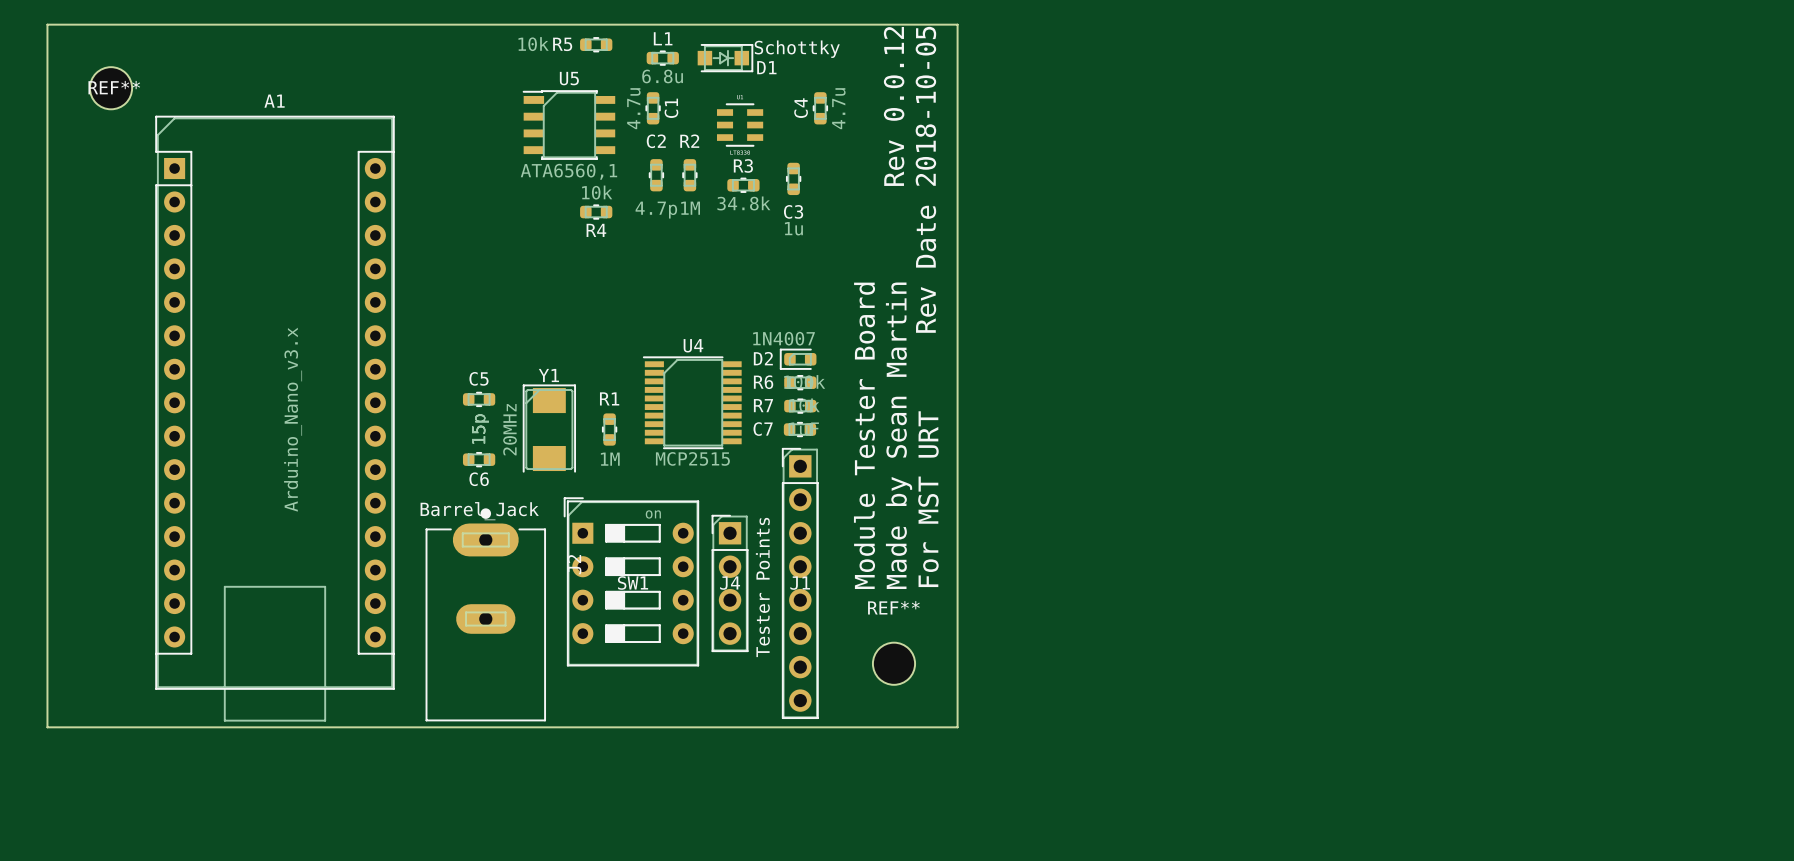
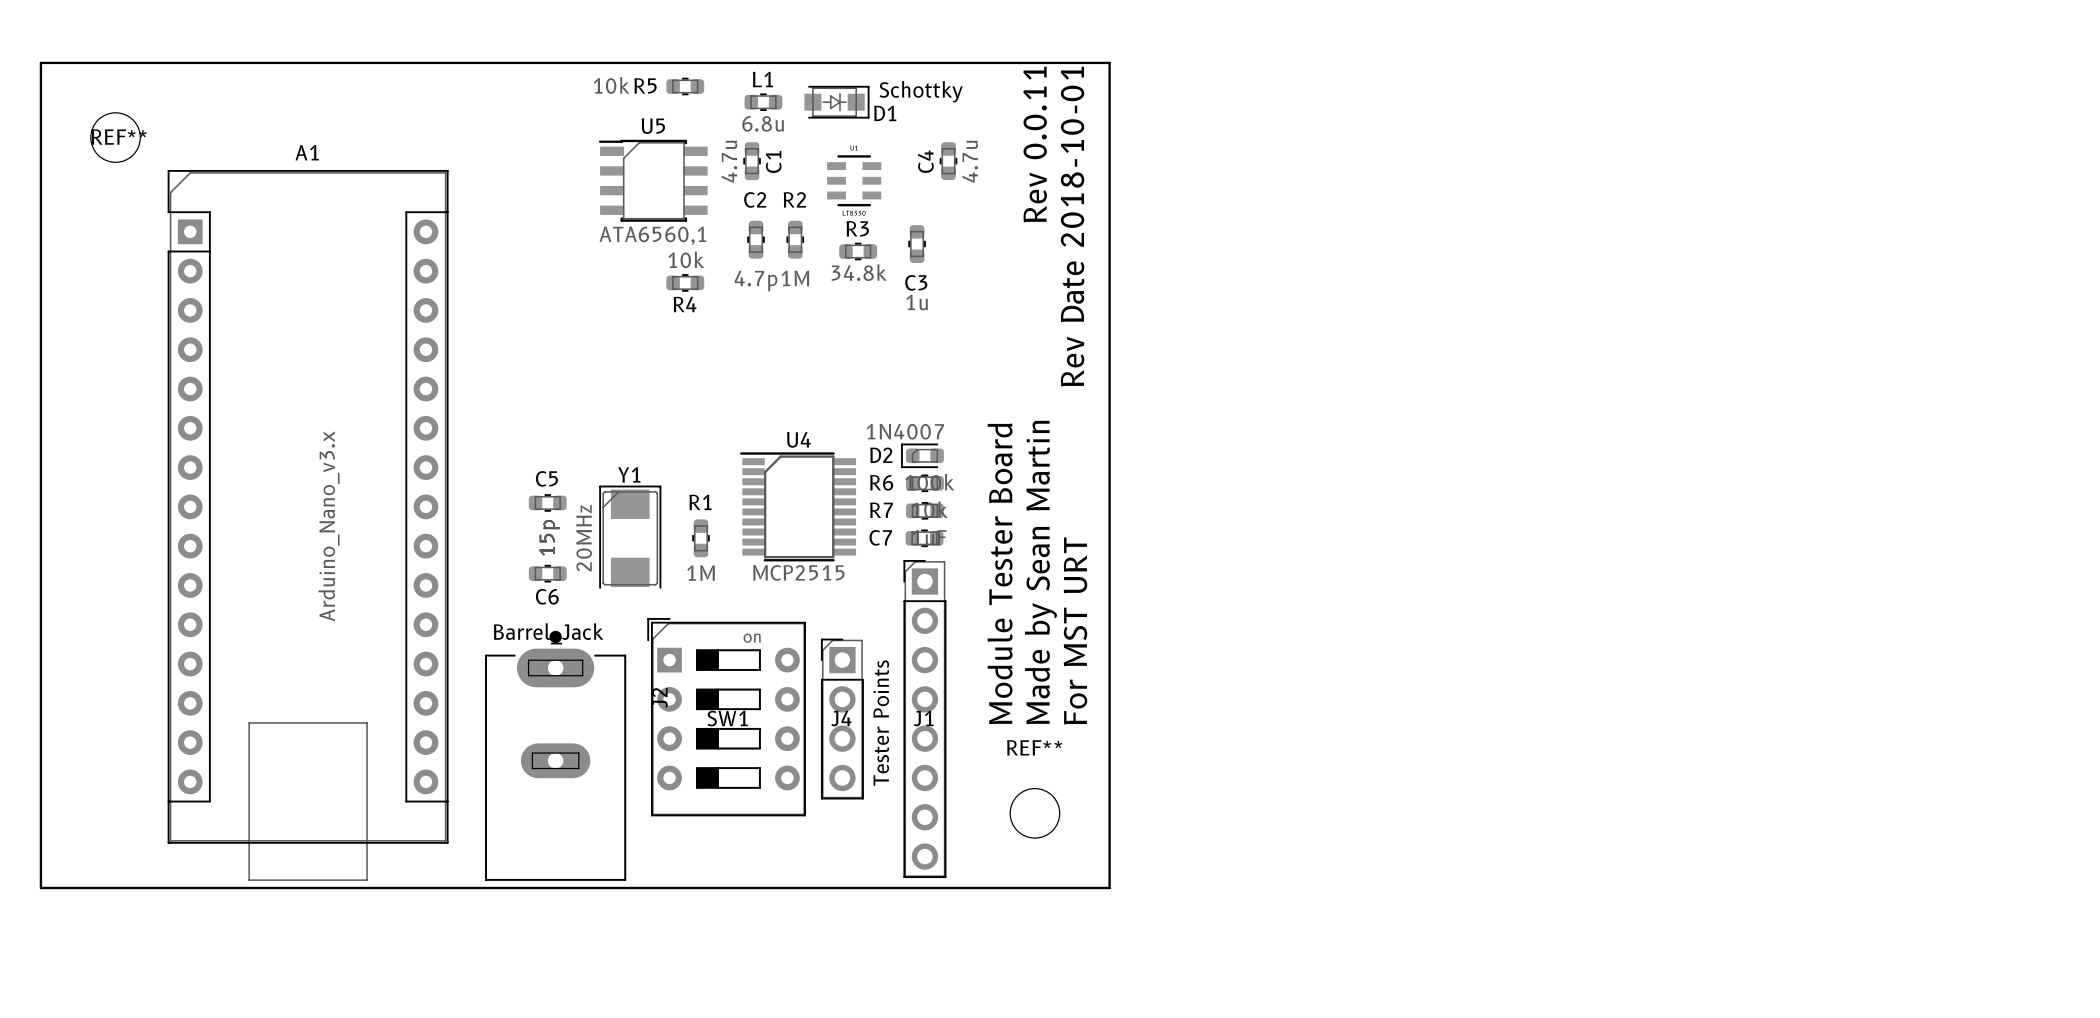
text: Rev 0.0.12 (894, 106) -> Rev 0.0.11 (1035, 144)
text: Rev Date 2018-10-05 (925, 179) -> Rev Date 2018-10-01 (1072, 226)

